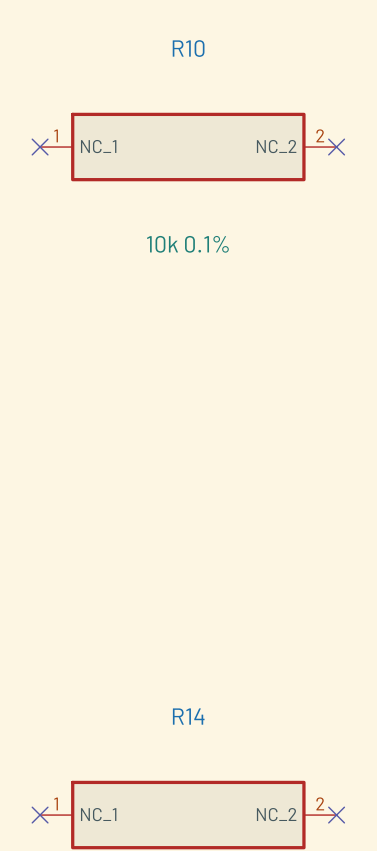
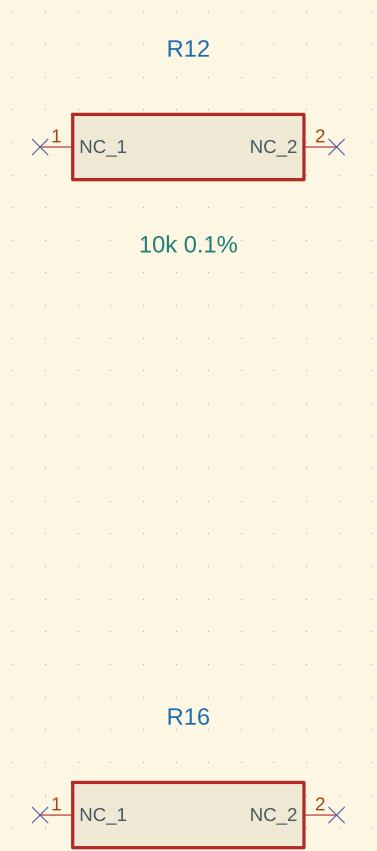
R10 name: R10 (188, 48) -> R12 (188, 48)
R14 name: R14 (188, 716) -> R16 (188, 716)

